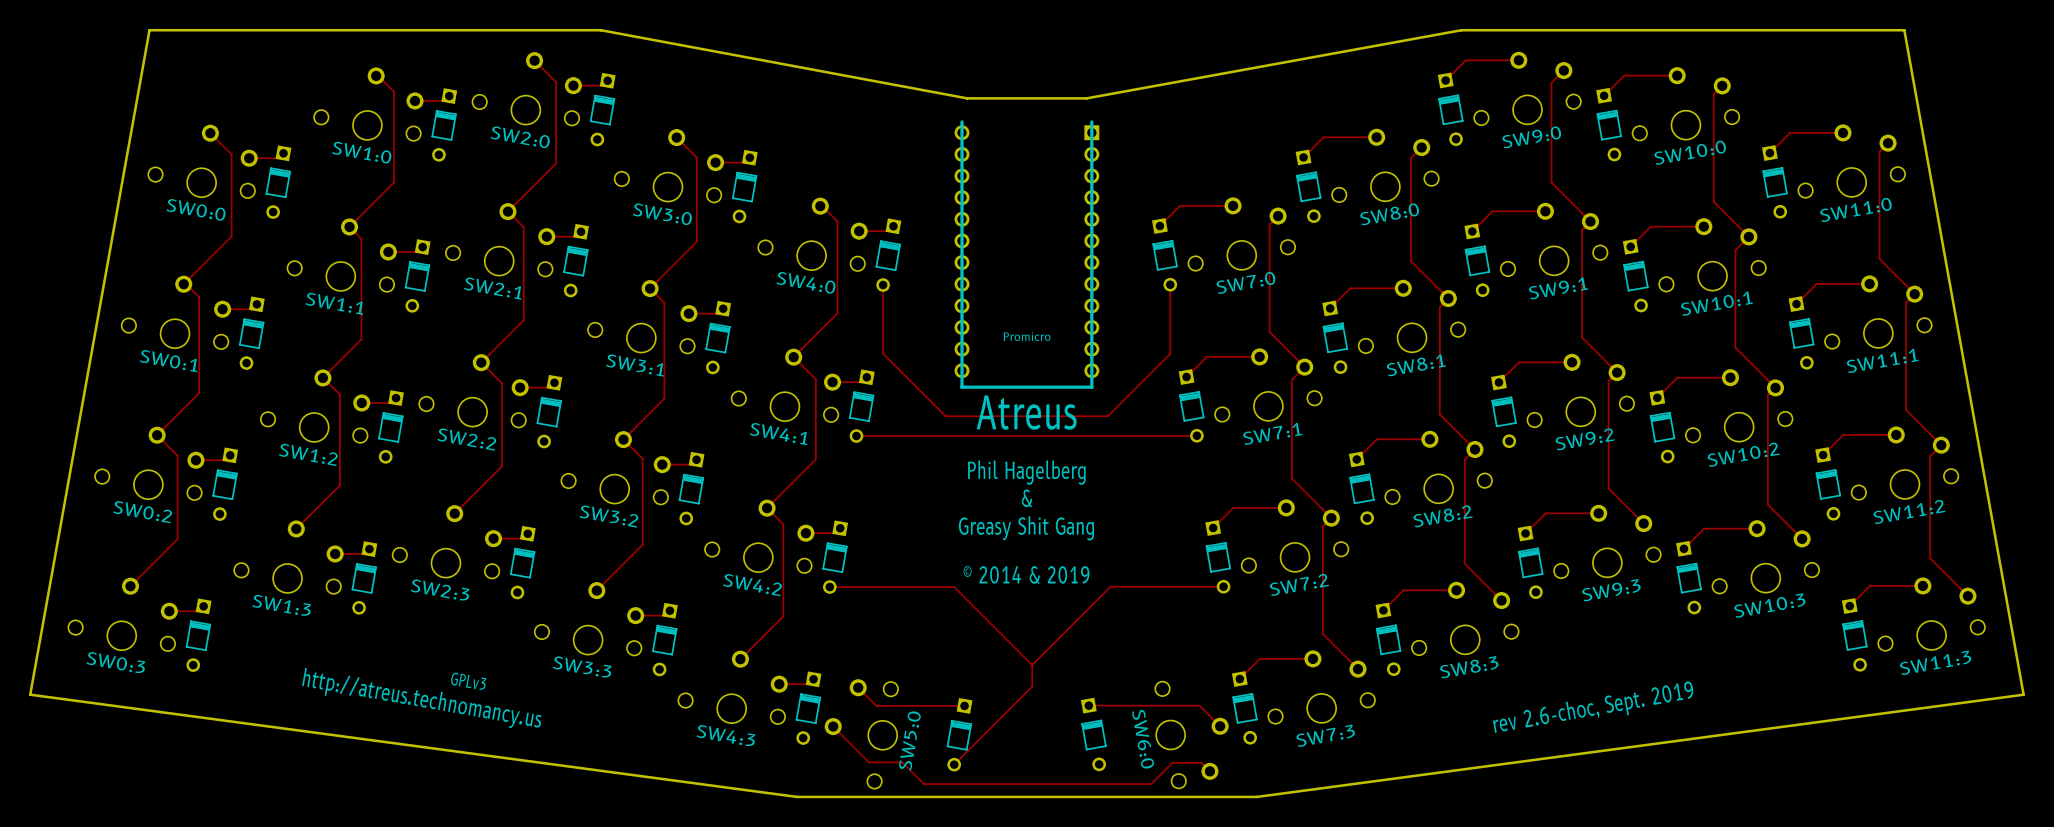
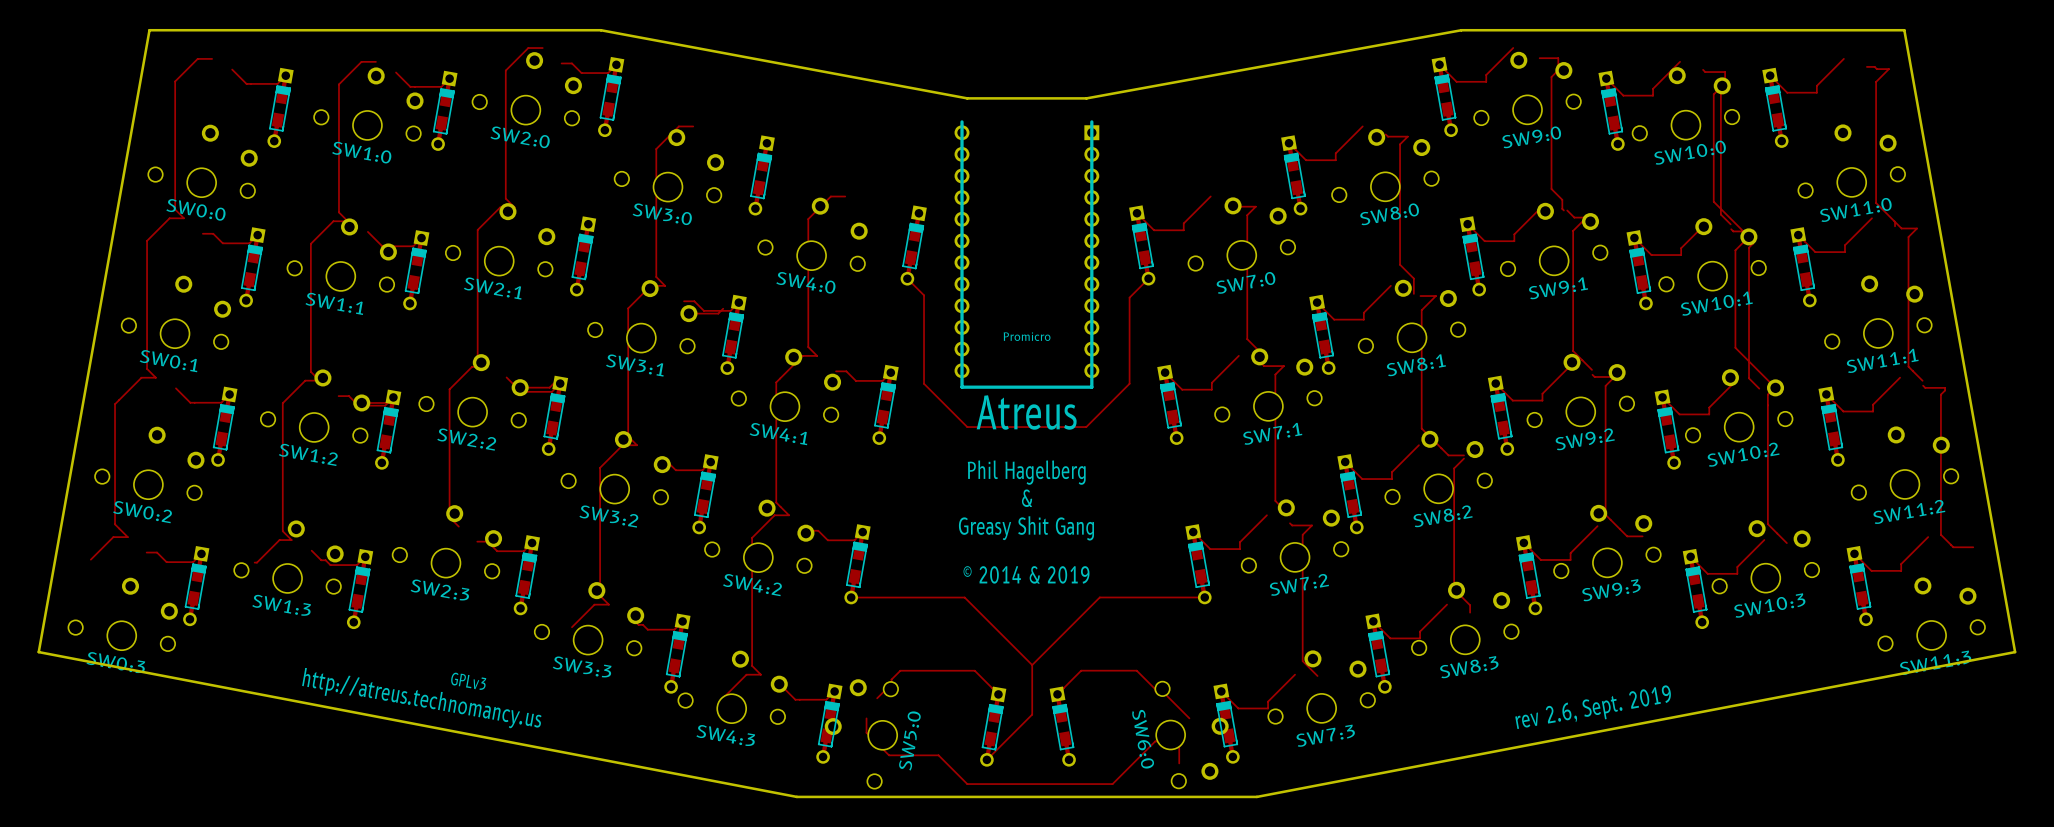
board edge: (149, 30) (30, 694) (796, 796) -> (149, 30) (38, 652) (796, 796)
board edge: (1904, 30) (2023, 694) (1256, 796) -> (1904, 30) (2015, 652) (1256, 796)
track: none -> (1513, 47) (1486, 74) (1486, 81) (1456, 81) (1439, 64)
track: none -> (542, 48) (528, 48) (505, 70) (505, 198) (514, 207) (500, 207) (477, 229) (477, 357) (486, 366) (472, 366) (449, 389) (449, 517) (458, 526)
track: none -> (212, 58) (197, 58) (175, 81) (175, 209) (183, 218) (169, 218) (147, 240) (147, 368) (155, 377) (141, 377) (115, 404) (115, 524) (127, 537) (113, 537) (90, 559)
track: none -> (1843, 58) (1816, 85) (1816, 92) (1787, 92) (1770, 75)
track: (534, 60) (556, 82) (556, 163) (507, 211) (523, 227) (523, 320) (481, 362) (502, 383) (502, 466) (454, 513) -> none
track: (1518, 60) (1465, 60) (1445, 80) -> none
track: none -> (375, 61) (361, 61) (338, 84) (338, 212) (347, 221) (333, 221) (310, 243) (310, 371) (319, 380) (305, 380) (282, 403) (282, 531) (291, 540) (279, 540) (257, 562) (254, 562)
track: none -> (1680, 61) (1653, 88) (1653, 95) (1623, 95) (1606, 78)
track: none -> (561, 63) (571, 63) (581, 73) (608, 73) (616, 64)
track: none -> (1866, 66) (1888, 69) (1876, 81) (1876, 202) (1901, 228) (1917, 228) (1908, 237) (1908, 366) (1922, 380)
track: none -> (232, 69) (246, 83) (277, 83) (285, 75)
track: none -> (1703, 69) (1705, 72) (1725, 72) (1725, 84) (1720, 88) (1720, 214) (1730, 224)
track: (1563, 70) (1551, 82) -> (1539, 58) (1558, 58) (1558, 70) (1551, 77) (1551, 82)
track: none -> (396, 72) (410, 86) (441, 86) (449, 78)
track: (378, 75) (393, 91) (393, 182) (349, 226) (361, 238) (361, 339) (322, 377) (339, 394) (339, 485) (296, 528) -> none
track: (1677, 75) (1624, 75) (1604, 95) -> none
track: (607, 80) (602, 85) (573, 85) -> none
track: (449, 96) (444, 100) (415, 100) -> none
part: none -> (611, 96)
part: none -> (1444, 96)
part: none -> (280, 107)
part: none -> (1775, 107)
part: (602, 109) -> none
part: (1450, 109) -> none
part: none -> (444, 110)
part: none -> (1611, 110)
part: (444, 124) -> none
part: (1609, 124) -> none
track: none -> (693, 126) (678, 126) (656, 149) (656, 277) (665, 285) (650, 285) (628, 308) (628, 436) (637, 445) (622, 445) (600, 467) (600, 595) (608, 604) (594, 604) (571, 627)
track: none -> (1362, 126) (1335, 153) (1335, 160) (1306, 160) (1289, 143)
track: (1843, 132) (1790, 132) (1769, 153) -> none
track: (210, 133) (231, 154) (231, 236) (183, 284) -> none
track: none -> (1385, 134) (1387, 136) (1407, 136) (1400, 144) (1400, 264) (1413, 278) (1413, 293)
track: (676, 137) (696, 157) (696, 241) (650, 288) (664, 302) (664, 398) (623, 439) (642, 458) (642, 544) (596, 590) -> none
track: (1376, 137) (1323, 137) (1303, 157) -> none
track: (1888, 143) (1879, 151) (1879, 259) (1914, 294) (1906, 302) (1906, 410) (1941, 445) (1930, 456) (1930, 558) (1967, 596) -> none
track: (1421, 147) (1410, 158) (1410, 261) (1448, 298) (1439, 307) (1439, 414) (1474, 449) (1464, 459) (1464, 563) (1501, 600) -> none
track: (283, 153) (278, 158) (249, 158) -> none
track: (749, 157) (744, 162) (715, 162) -> none
part: none -> (761, 175)
part: none -> (1294, 175)
part: (1774, 181) -> none
part: (278, 182) -> none
track: (1551, 182) (1590, 221) (1581, 230) (1581, 337) (1617, 372) (1608, 381) (1608, 488) (1643, 523) -> (1551, 182) (1551, 189) (1562, 199) (1563, 210)
part: (744, 186) -> none
part: (1308, 186) -> none
track: none -> (845, 196) (830, 196) (808, 219) (808, 347) (817, 355) (802, 355) (776, 382) (776, 502) (789, 515) (774, 515) (752, 537) (752, 665) (760, 674) (746, 674) (723, 697)
track: none -> (1210, 196) (1183, 223) (1183, 230) (1154, 230) (1137, 213)
track: none -> (1233, 204) (1235, 206) (1255, 206) (1247, 215) (1247, 339) (1261, 353)
track: (1233, 205) (1180, 205) (1159, 226) -> none
track: (822, 206) (837, 221) (837, 313) (793, 357) (815, 379) (815, 459) (767, 508) (783, 524) (783, 616) (740, 659) -> none
track: none -> (1541, 207) (1514, 234) (1514, 241) (1484, 241) (1467, 224)
track: none -> (1567, 210) (1574, 217) (1586, 217) (1573, 230) (1573, 351) (1591, 369)
track: (1545, 211) (1492, 211) (1472, 231) -> none
track: (1278, 216) (1269, 224) (1269, 331) (1304, 367) (1291, 379) (1291, 478) (1331, 518) (1322, 526) (1322, 633) (1357, 669) -> none
track: none -> (1871, 218) (1844, 245) (1844, 252) (1815, 252) (1798, 235)
track: none -> (1708, 221) (1681, 248) (1681, 255) (1651, 255) (1634, 237)
track: none -> (1895, 221) (1895, 226)
part footprint: [563, 223, 589, 298] -> [569, 216, 597, 297]
part footprint: [1464, 223, 1491, 298] -> [1459, 216, 1487, 297]
track: (893, 226) (888, 231) (859, 231) -> none
track: (1703, 226) (1650, 226) (1630, 246) -> none
track: none -> (1731, 229) (1733, 231) (1753, 231) (1753, 243) (1749, 247) (1749, 378) (1759, 388)
track: none -> (367, 231) (382, 246) (413, 246) (421, 238)
track: (581, 231) (576, 236) (546, 236) -> none
track: none -> (202, 233) (213, 233) (222, 243) (249, 243) (257, 235)
part footprint: [1622, 238, 1649, 313] -> [1626, 230, 1653, 311]
part footprint: [404, 239, 431, 313] -> [403, 230, 430, 311]
part: none -> (913, 245)
part: none -> (1142, 245)
track: (422, 247) (417, 251) (388, 251) -> none
part: (1164, 254) -> none
part: (888, 255) -> none
part: none -> (252, 267)
part: none -> (1803, 267)
track: none -> (1148, 278) (1129, 297) (1129, 383) (1086, 427) (967, 427) (924, 383) (924, 295) (907, 278)
track: (1869, 283) (1816, 283) (1796, 304) -> none
track: (186, 284) (199, 297) (199, 393) (157, 435) (177, 455) (177, 539) (130, 586) -> none
track: (1170, 284) (1170, 353) (1107, 416) (945, 416) (883, 353) (883, 285) -> none
track: none -> (1390, 285) (1363, 312) (1363, 319) (1334, 319) (1317, 302)
track: (1403, 288) (1350, 288) (1330, 308) -> none
track: none -> (1420, 296) (1435, 296) (1421, 310) (1421, 428) (1448, 455) (1463, 455)
track: none -> (684, 301) (694, 301) (703, 310) (730, 310) (738, 302)
track: (256, 304) (251, 309) (222, 309) -> none
part: (1801, 332) -> none
part: (251, 333) -> none
part: none -> (733, 334)
part: none -> (1322, 334)
part: (718, 337) -> none
part: (1335, 337) -> none
track: none -> (1238, 355) (1211, 382) (1211, 389) (1182, 389) (1165, 372)
track: (1259, 356) (1206, 356) (1186, 377) -> none
track: (1572, 362) (1519, 362) (1498, 382) -> none
track: none -> (1261, 363) (1264, 366) (1283, 366) (1275, 374) (1275, 500) (1289, 515)
track: none -> (1569, 366) (1542, 393) (1542, 400) (1512, 400) (1495, 383)
track: none -> (836, 371) (846, 371) (855, 380) (882, 380) (890, 372)
part footprint: [536, 374, 563, 449] -> [541, 375, 569, 456]
part footprint: [1491, 374, 1517, 449] -> [1487, 375, 1515, 456]
track: none -> (1592, 374) (1594, 376) (1614, 376) (1605, 385) (1605, 514) (1627, 536) (1642, 536)
track: none -> (506, 377) (516, 387) (520, 387) (525, 391) (551, 391) (560, 383)
track: (866, 377) (861, 382) (832, 382) -> none
track: (1730, 377) (1677, 377) (1657, 397) -> none
track: none -> (1900, 377) (1873, 404) (1873, 411) (1843, 411) (1826, 394)
track: none -> (1736, 380) (1709, 407) (1709, 414) (1679, 414) (1662, 397)
track: none -> (1923, 385) (1925, 387) (1945, 387) (1940, 394) (1940, 534) (1953, 547) (1973, 547)
track: none -> (175, 388) (190, 402) (221, 402) (229, 394)
part footprint: [1649, 389, 1676, 464] -> [1654, 389, 1681, 470]
part footprint: [378, 390, 404, 464] -> [375, 389, 402, 470]
track: none -> (338, 396) (348, 396) (358, 405) (385, 405) (393, 397)
part: none -> (885, 404)
part: none -> (1170, 404)
part: (1191, 405) -> none
part: (861, 406) -> none
part: none -> (224, 426)
part: none -> (1831, 426)
track: (1896, 434) (1843, 434) (1823, 455) -> none
track: (1196, 435) (856, 436) -> none
track: (1429, 439) (1376, 439) (1356, 459) -> none
track: none -> (1418, 445) (1391, 472) (1391, 479) (1362, 479) (1345, 461)
track: (230, 455) (225, 460) (195, 460) -> none
track: none -> (1463, 458) (1454, 468) (1454, 589) (1470, 605) (1470, 612)
track: (696, 459) (691, 464) (662, 464) -> none
track: none -> (655, 460) (666, 460) (675, 470) (702, 470) (710, 462)
part: (1828, 483) -> none
part: (225, 484) -> none
part: (691, 488) -> none
part: (1361, 488) -> none
part: none -> (705, 494)
part: none -> (1350, 494)
track: (1767, 504) (1802, 538) -> (1767, 504) (1767, 524) (1786, 543)
track: (1286, 507) (1233, 507) (1213, 528) -> none
track: (1598, 513) (1545, 513) (1525, 533) -> none
track: none -> (1266, 515) (1239, 542) (1239, 549) (1210, 549) (1193, 532)
track: none -> (1289, 523) (1292, 525) (1311, 525) (1302, 534) (1302, 661) (1317, 676)
track: none -> (1597, 526) (1570, 553) (1570, 559) (1540, 559) (1523, 542)
track: (840, 528) (835, 533) (805, 533) -> none
track: (1757, 528) (1704, 528) (1683, 548) -> none
track: none -> (807, 530) (818, 530) (827, 540) (854, 540) (862, 532)
track: (527, 533) (522, 538) (493, 538) -> none
track: none -> (1928, 537) (1901, 564) (1901, 570) (1871, 570) (1854, 553)
track: none -> (1764, 540) (1737, 566) (1737, 573) (1707, 573) (1690, 556)
track: none -> (477, 541) (487, 541) (497, 551) (523, 551) (532, 542)
track: (369, 549) (364, 553) (335, 553) -> none
track: none -> (311, 550) (321, 560) (325, 560) (330, 565) (357, 565) (365, 556)
track: none -> (146, 552) (157, 552) (166, 562) (193, 562) (201, 553)
part: (1218, 556) -> none
part: (835, 557) -> none
part: (522, 562) -> none
part: (1530, 562) -> none
part: none -> (857, 564)
part: none -> (1198, 564)
part: none -> (526, 575)
part: none -> (1529, 575)
part: (364, 577) -> none
part: (1688, 577) -> none
track: (1922, 585) (1869, 585) (1849, 606) -> none
part: none -> (196, 586)
track: (1223, 586) (1110, 586) (1099, 597) -> (1204, 597) (1099, 597)
part: none -> (1859, 586)
track: (829, 587) (954, 587) (964, 597) -> (851, 597) (964, 597)
part: none -> (1695, 588)
part: none -> (360, 589)
track: (1456, 590) (1403, 590) (1383, 610) -> none
track: none -> (1447, 604) (1420, 631) (1420, 638) (1390, 638) (1373, 621)
track: (203, 606) (198, 611) (169, 611) -> none
track: (669, 610) (665, 615) (635, 615) -> none
track: none -> (629, 615) (638, 624) (642, 624) (647, 629) (674, 629) (682, 621)
part: (1854, 634) -> none
part: (198, 635) -> none
part: (664, 639) -> none
part: (1388, 639) -> none
part: none -> (677, 653)
part: none -> (1378, 653)
track: (1312, 658) (1259, 658) (1239, 679) -> none
track: none -> (1295, 674) (1268, 701) (1268, 708) (1238, 708) (1221, 691)
track: (813, 679) (808, 684) (779, 684) -> none
track: none -> (781, 685) (795, 699) (826, 699) (834, 691)
track: (1032, 686) (954, 764) -> (1032, 686) (1032, 714) (986, 759)
track: (858, 687) (876, 705) (964, 705) -> none
track: none -> (998, 694) (974, 670) (900, 670) (891, 679) (891, 683) (877, 698)
track: none -> (1057, 694) (1081, 670) (1136, 670) (1155, 691) (1162, 691) (1189, 718)
track: (1088, 705) (1199, 705) (1220, 726) -> none
part: (1244, 707) -> none
text: rev 2.6-choc, Sept. 2019 (1593, 707) -> rev 2.6, Sept. 2019 (1593, 707)
part: (808, 708) -> none
part: none -> (829, 723)
part: none -> (1226, 723)
track: (833, 726) (869, 762) (902, 762) (924, 784) (967, 784) -> (866, 718) (866, 732) (889, 755) (938, 755) (967, 784)
part: none -> (993, 726)
part: none -> (1062, 726)
part: (959, 734) -> none
part: (1093, 734) -> none
track: (1209, 771) (1201, 762) (1172, 762) (1151, 784) (1112, 784) -> (1179, 763) (1179, 743) (1181, 741) (1155, 741) (1112, 784)

